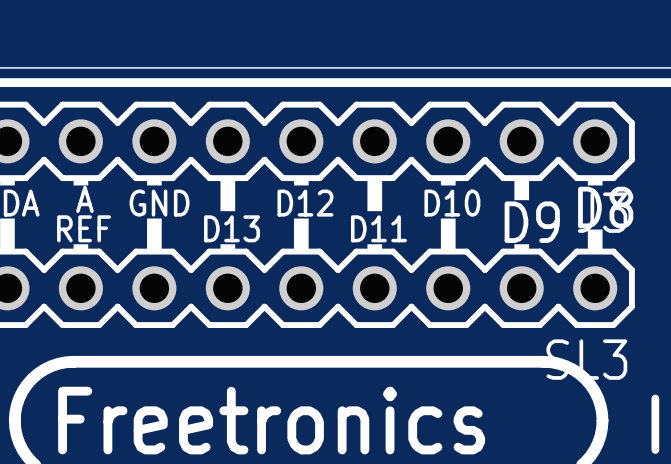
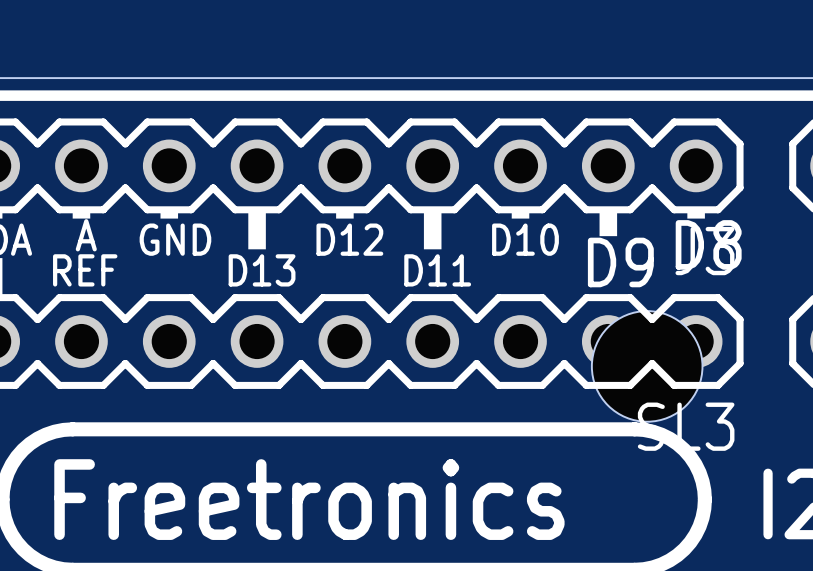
drawing: [147, 218, 162, 252] -> none
drawing: [293, 218, 309, 252] -> none
drawing: [440, 218, 456, 252] -> none
drawing: [587, 229, 603, 252] -> none
drawing: [73, 244, 89, 252] -> none
drawing: [220, 244, 236, 252] -> none
drawing: [367, 244, 383, 252] -> none
drawing: [514, 244, 530, 252] -> none
hole: none -> (647, 366)

